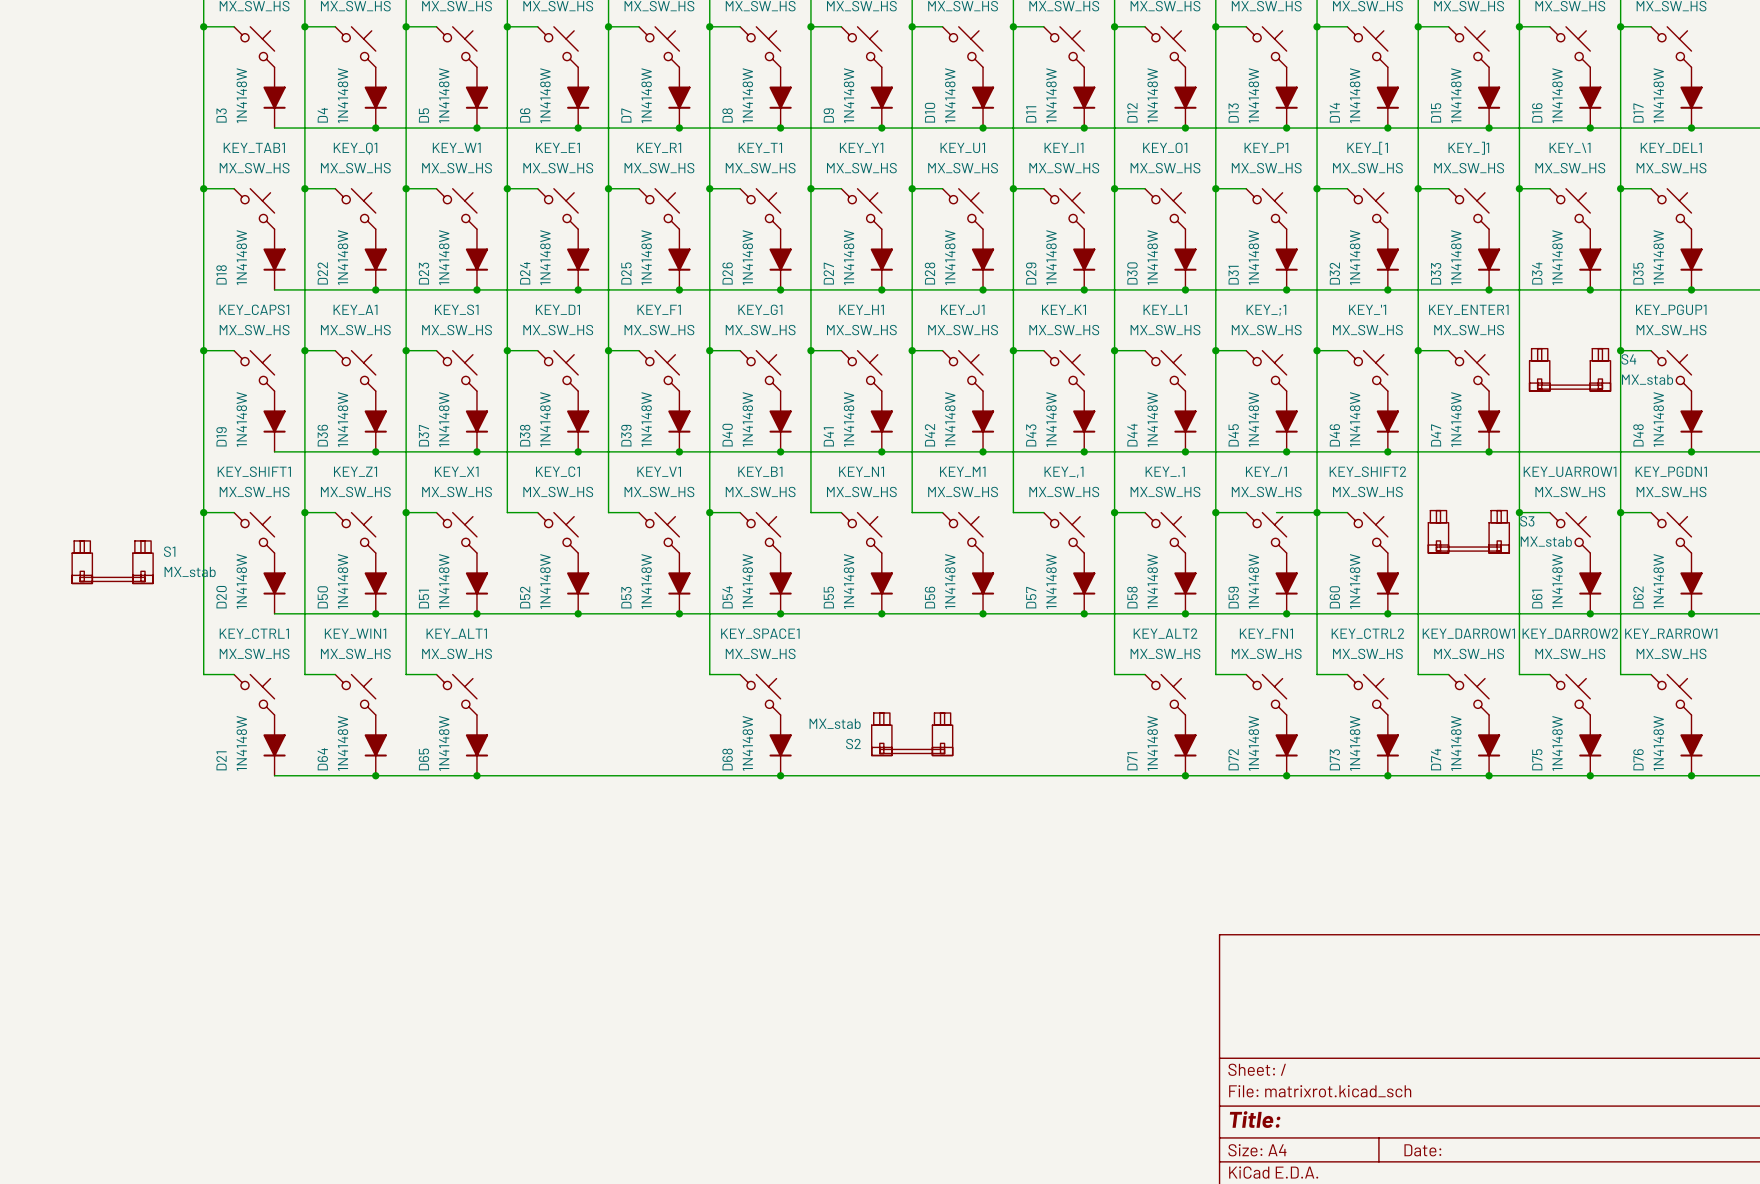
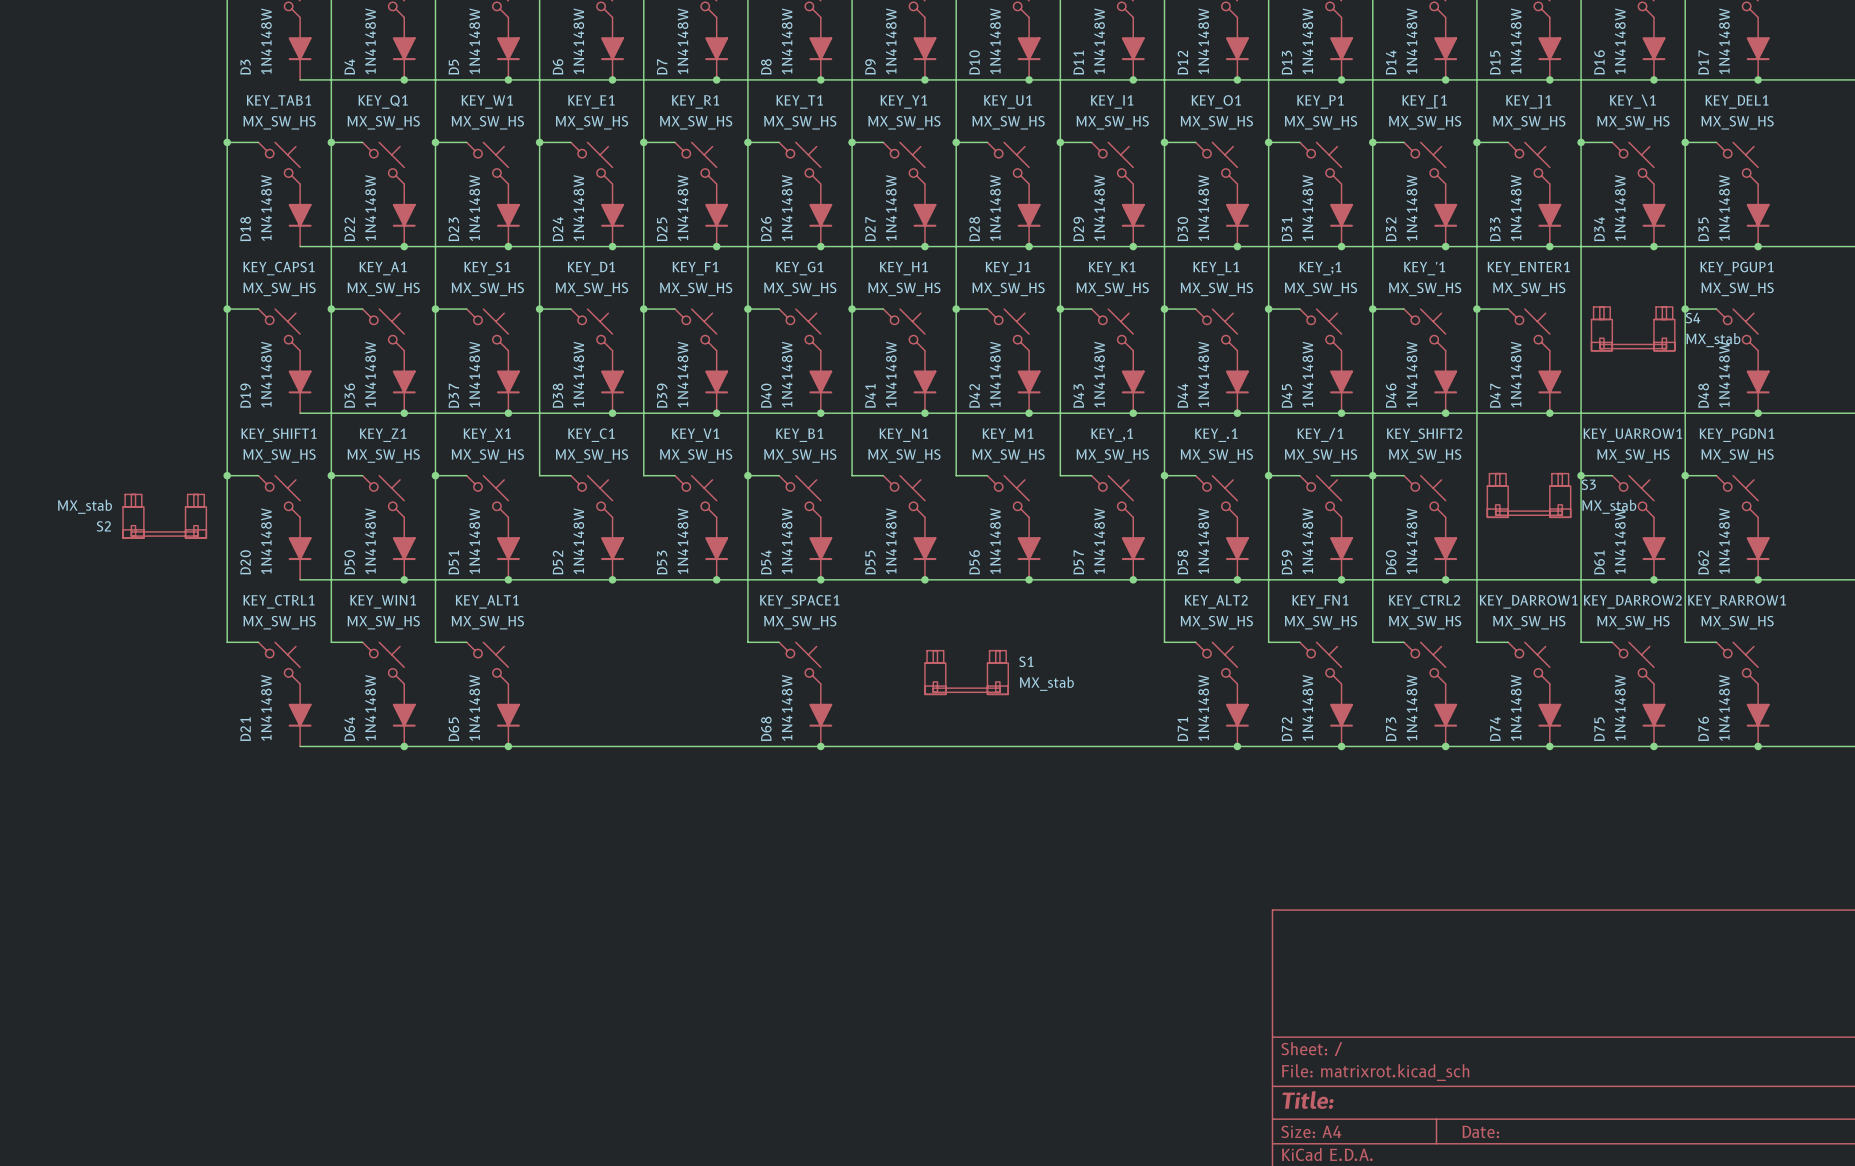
S1 position: (112, 562) -> (966, 672)
S2 position: (912, 734) -> (164, 516)

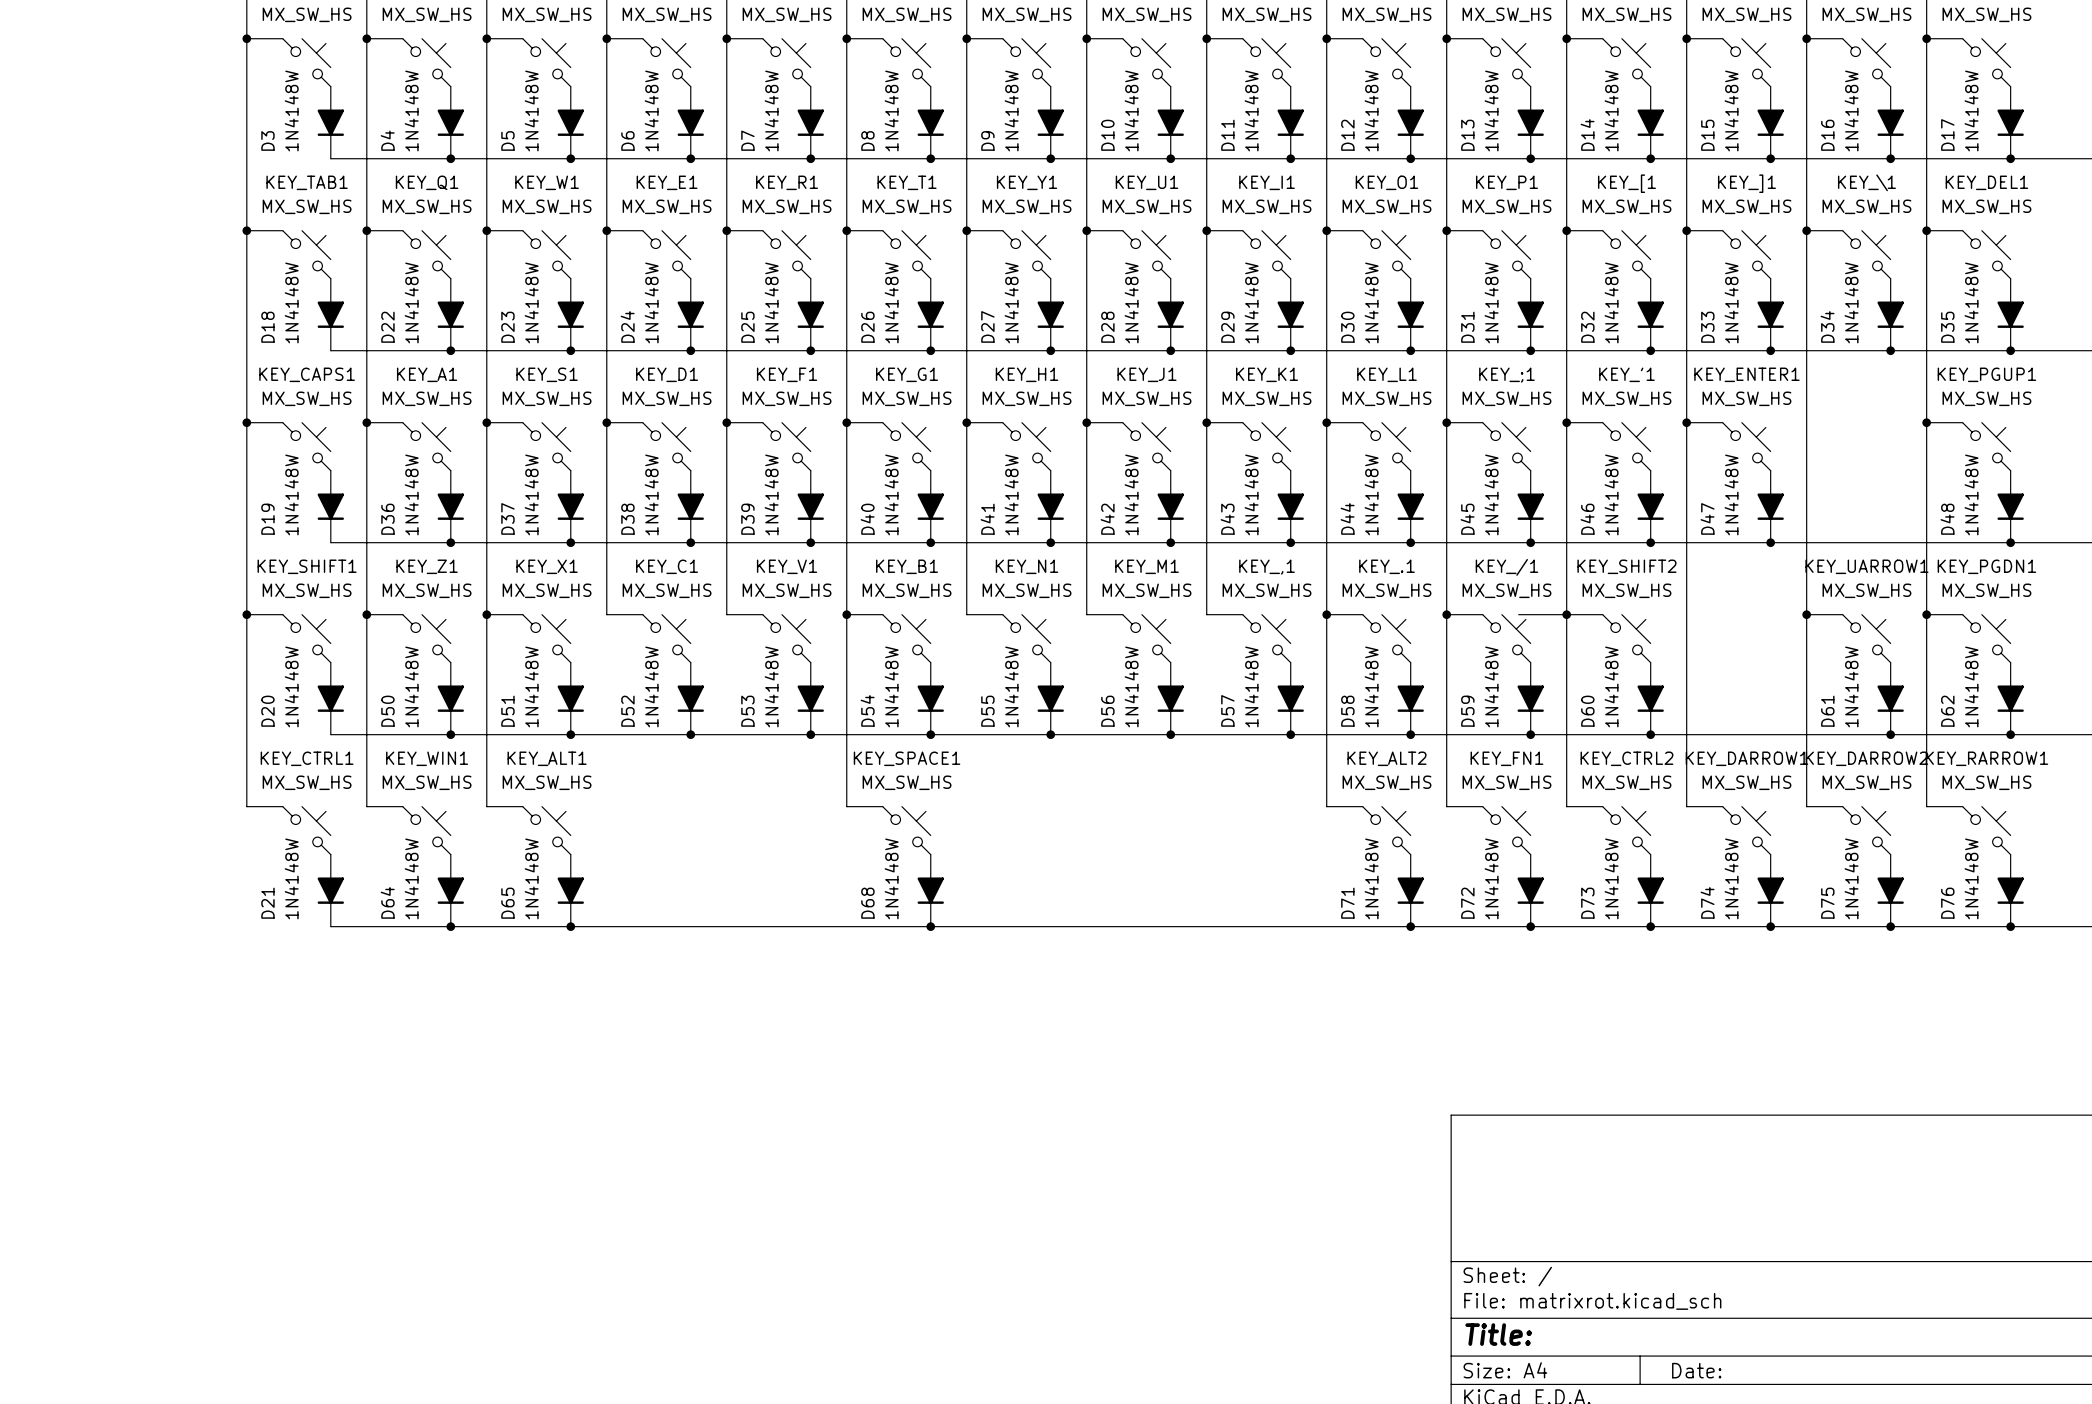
S4: MX_stab (1633, 328) -> none
S3: MX_stab (1529, 495) -> none
S2: MX_stab (164, 516) -> none
S1: MX_stab (966, 672) -> none

